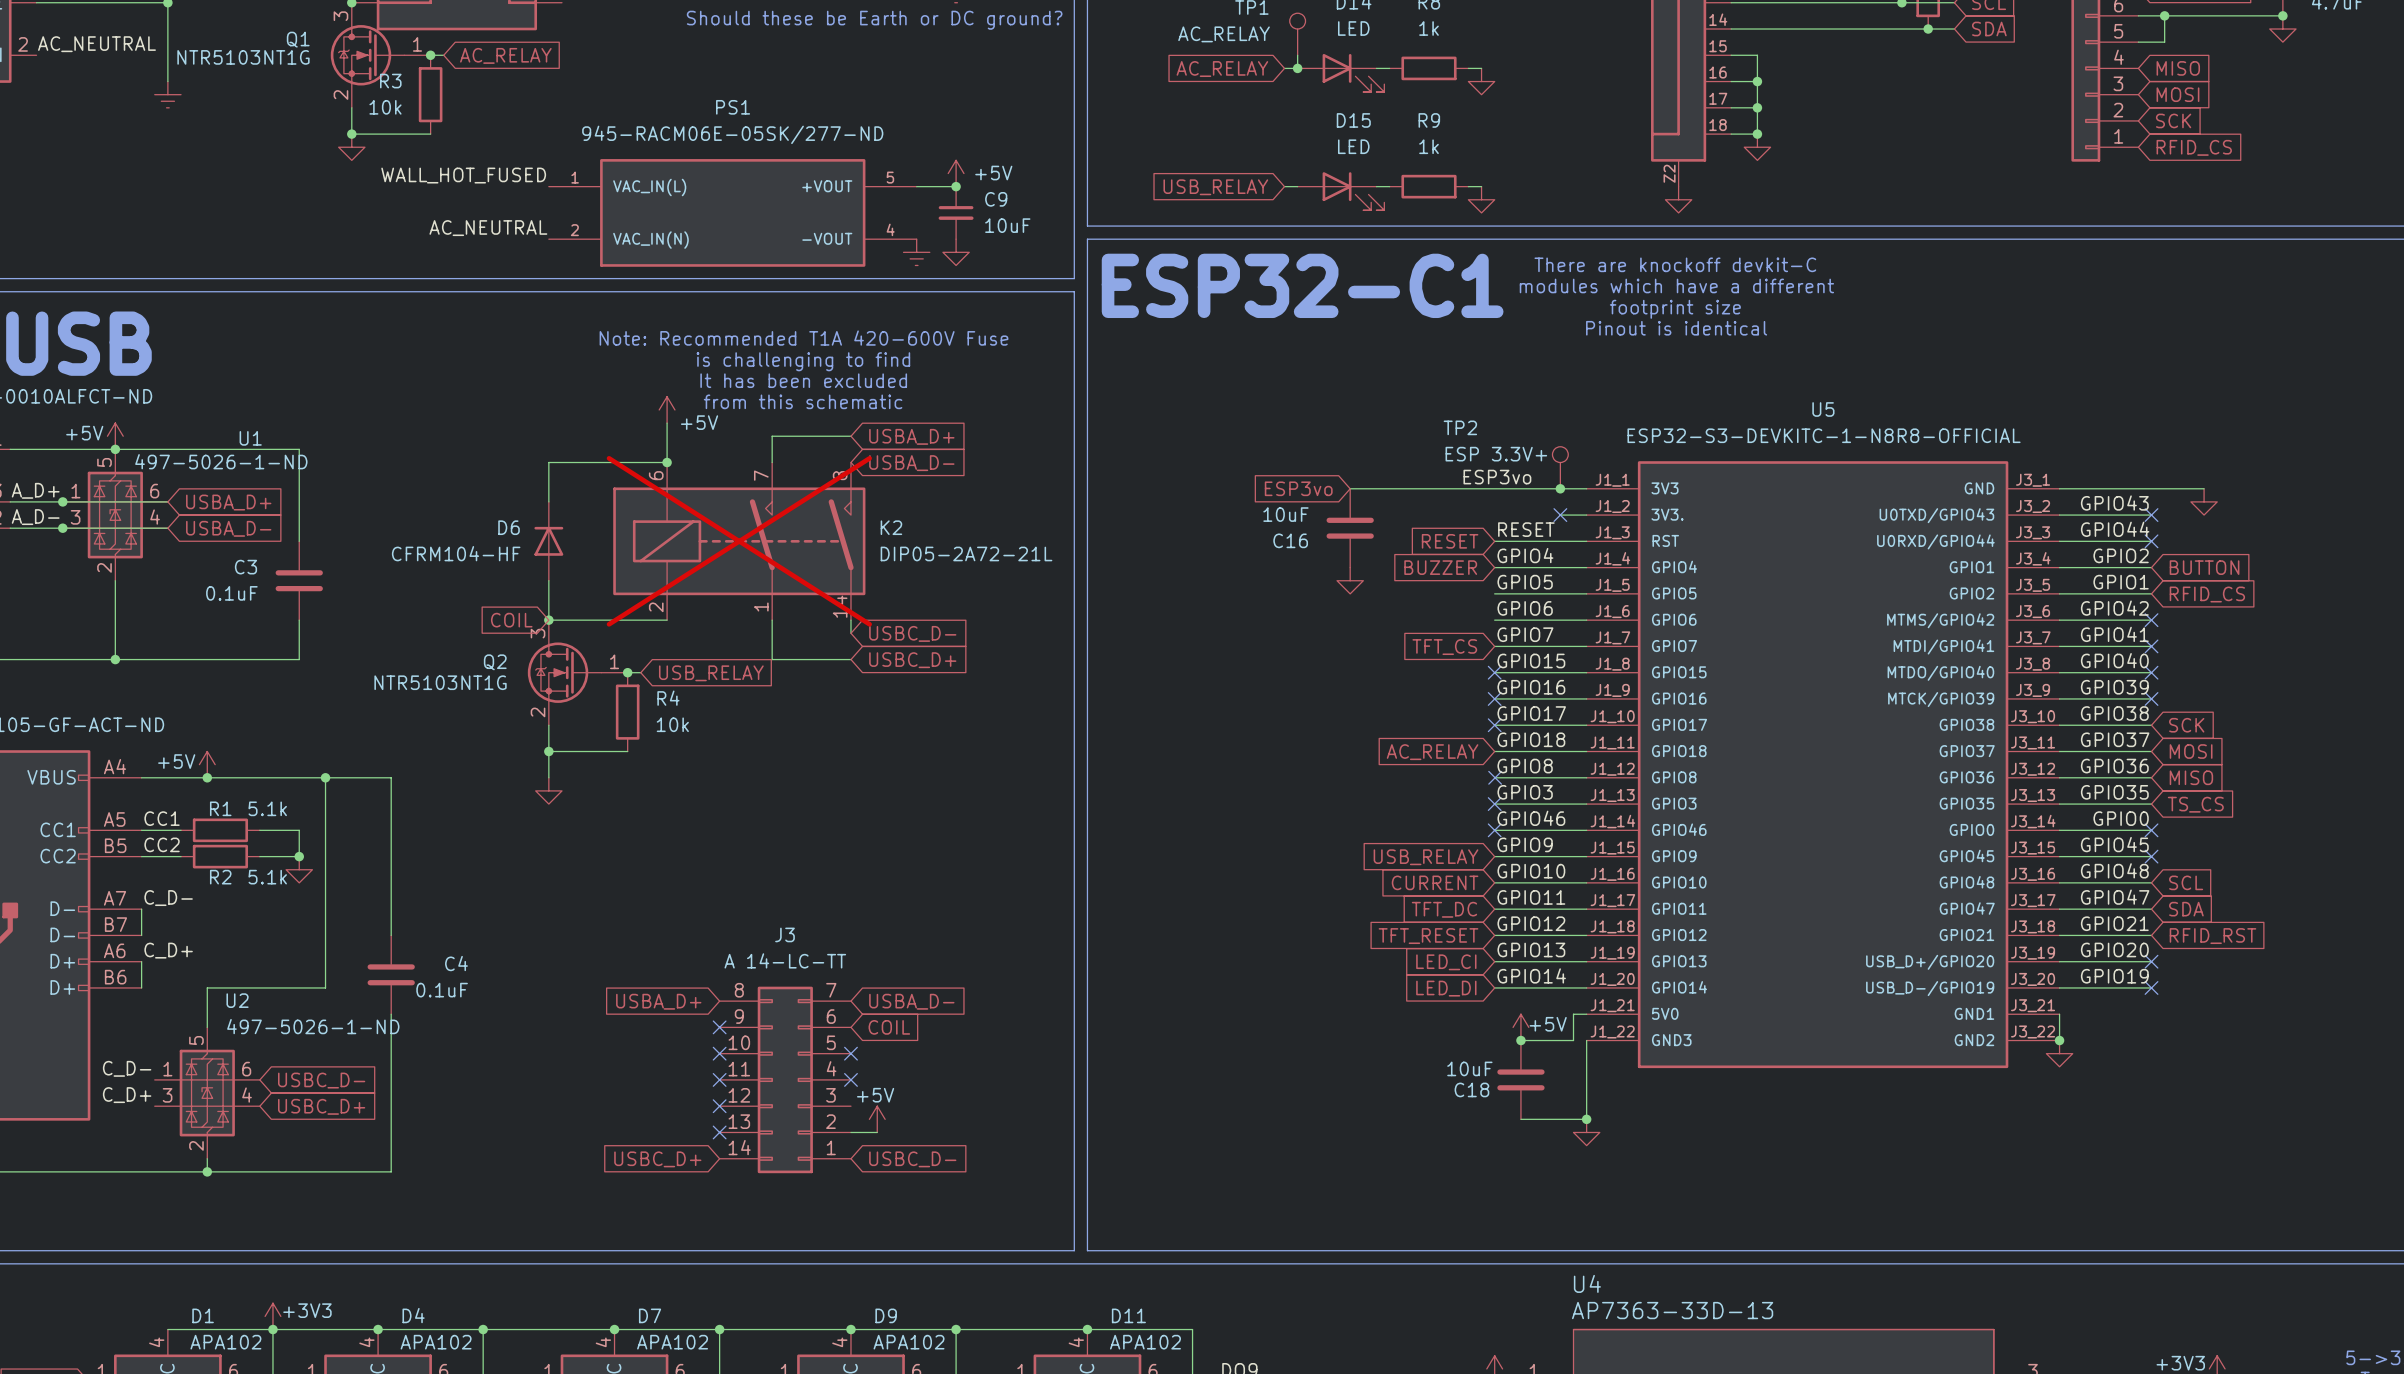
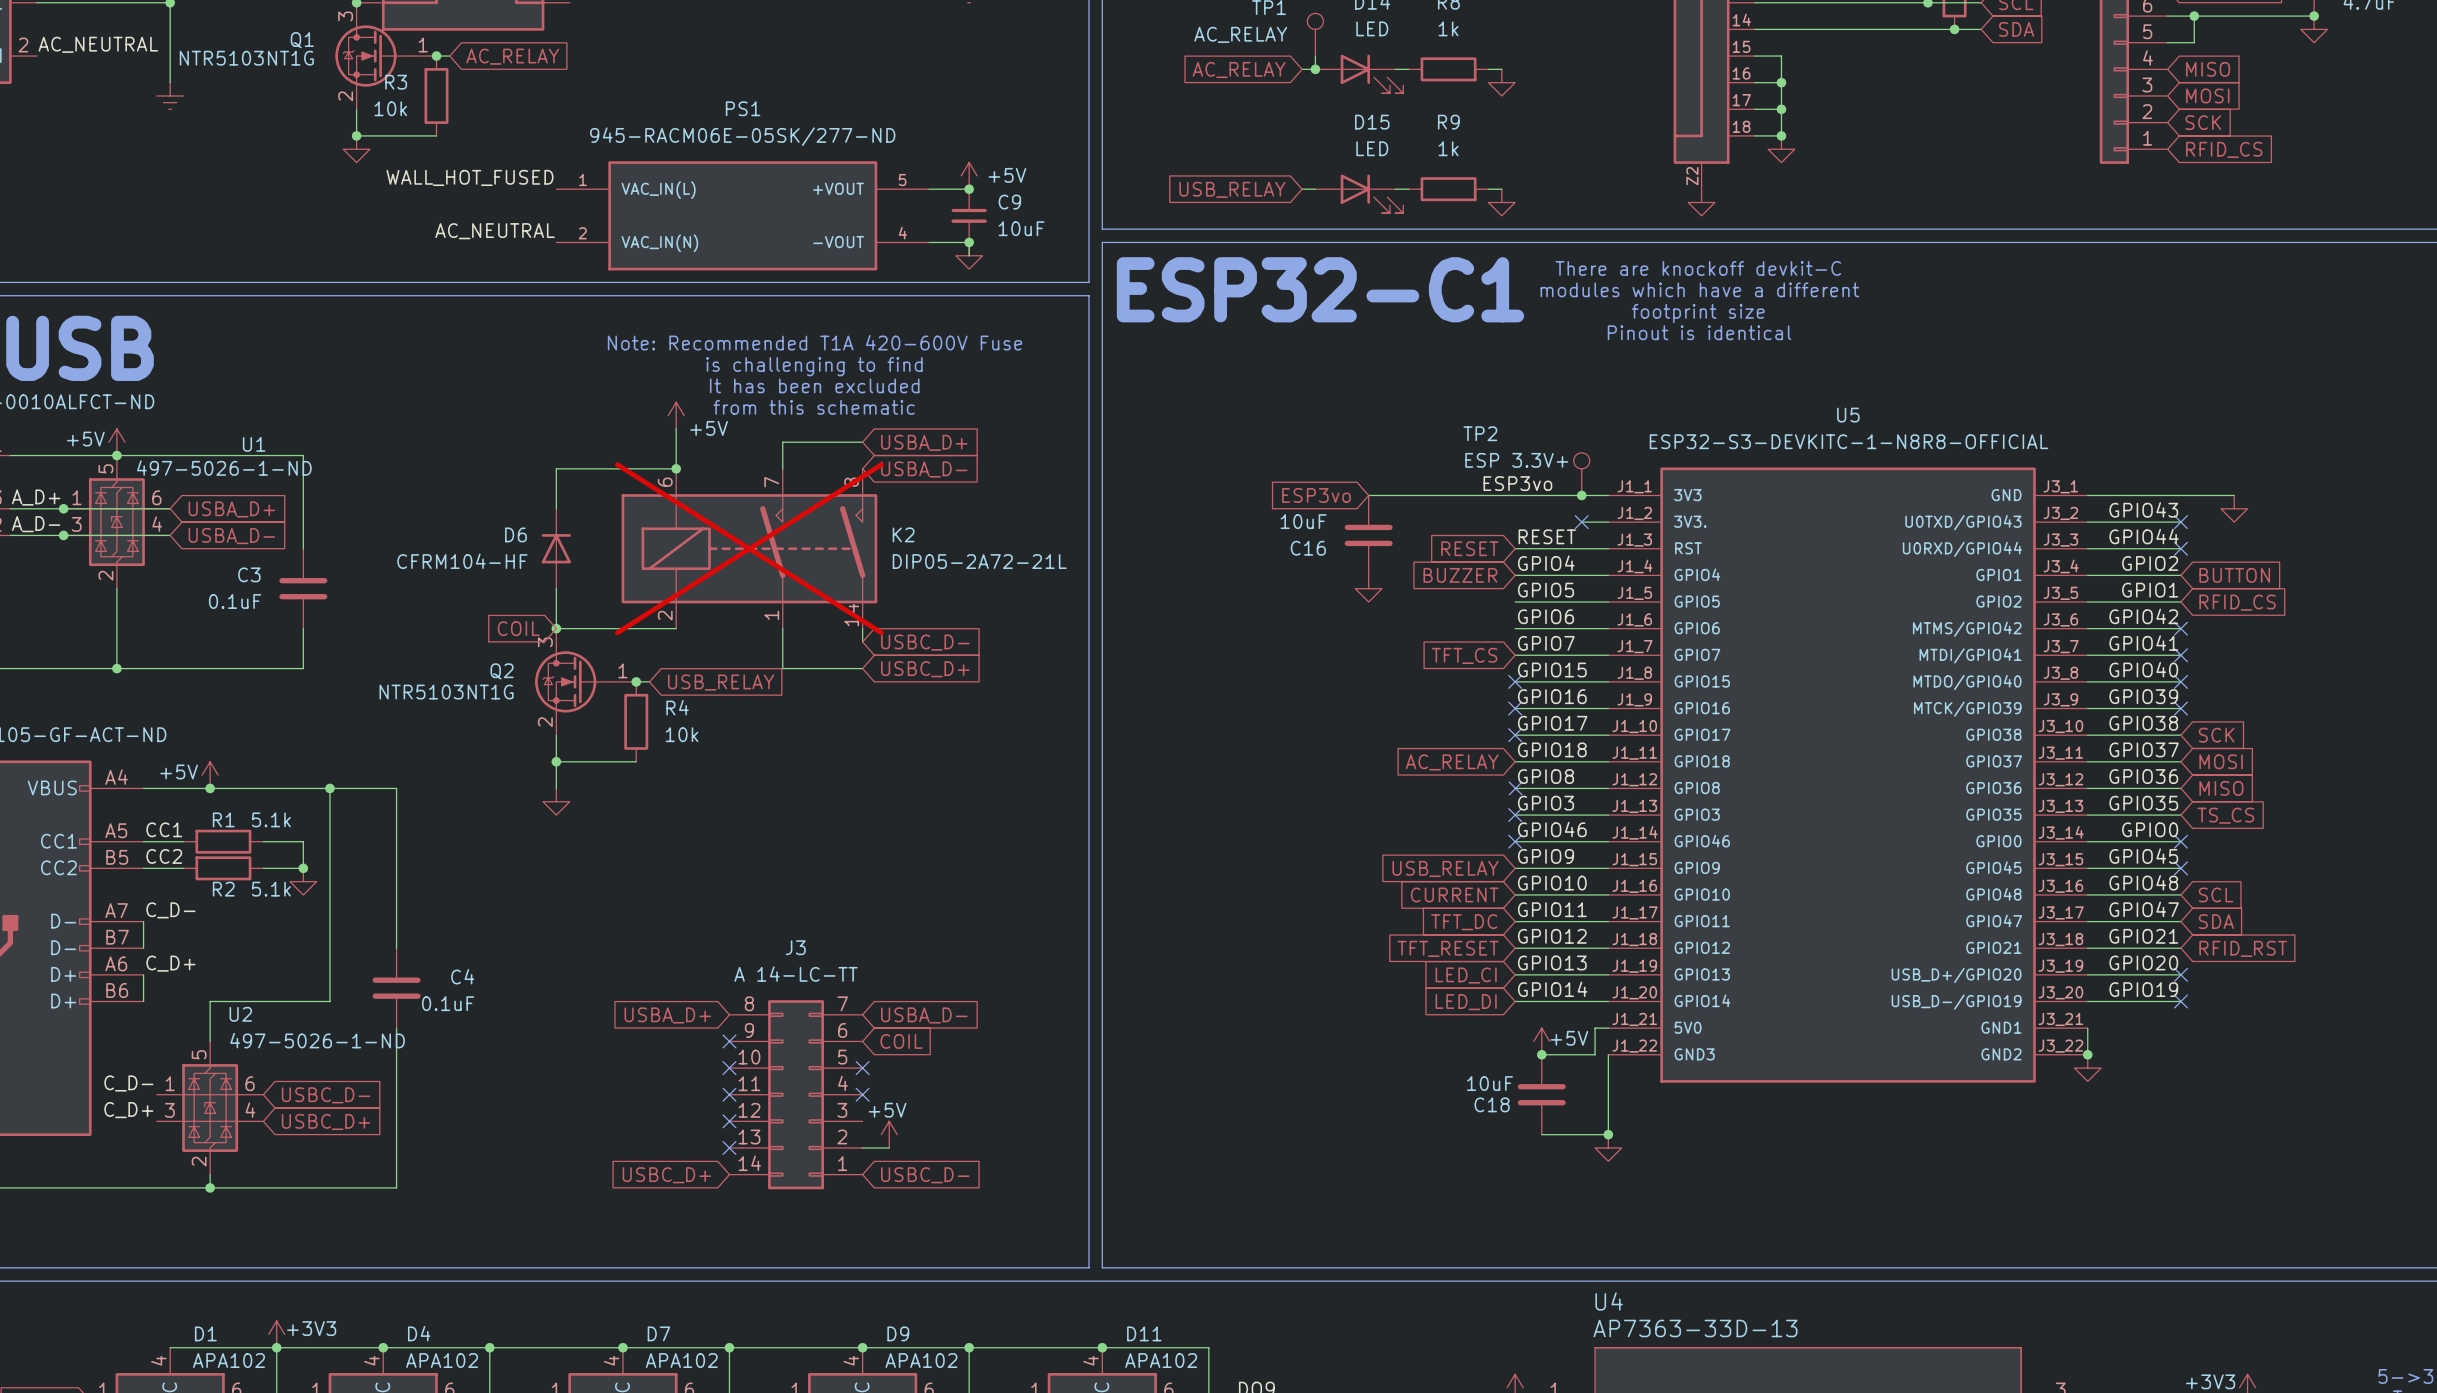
text: Should these be Earth or DC ground? (874, 20) -> none
wire: none -> (929, 242) (969, 242) (969, 255)
junction: none -> (969, 242)
power symbol: (916, 252) -> none

